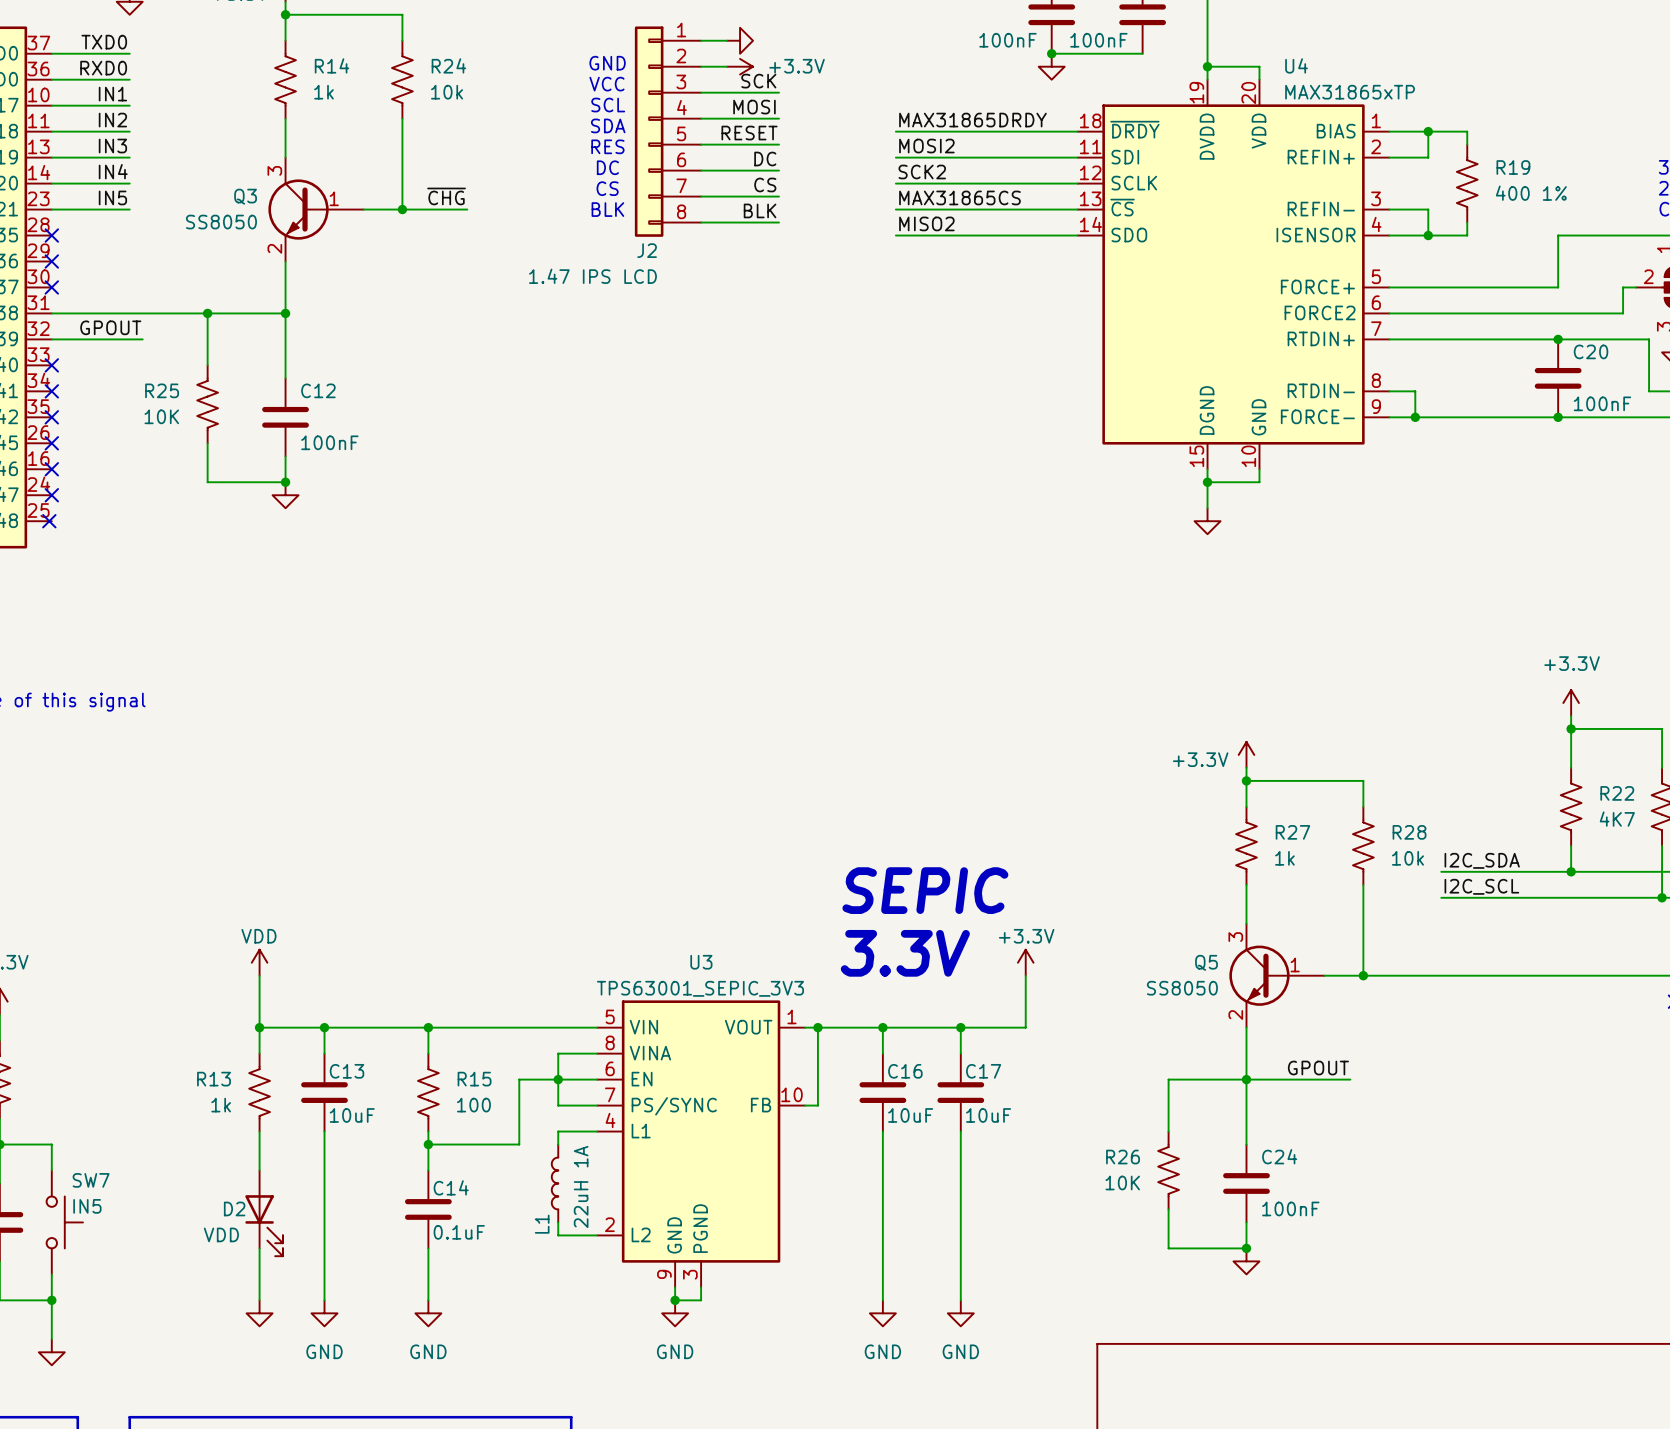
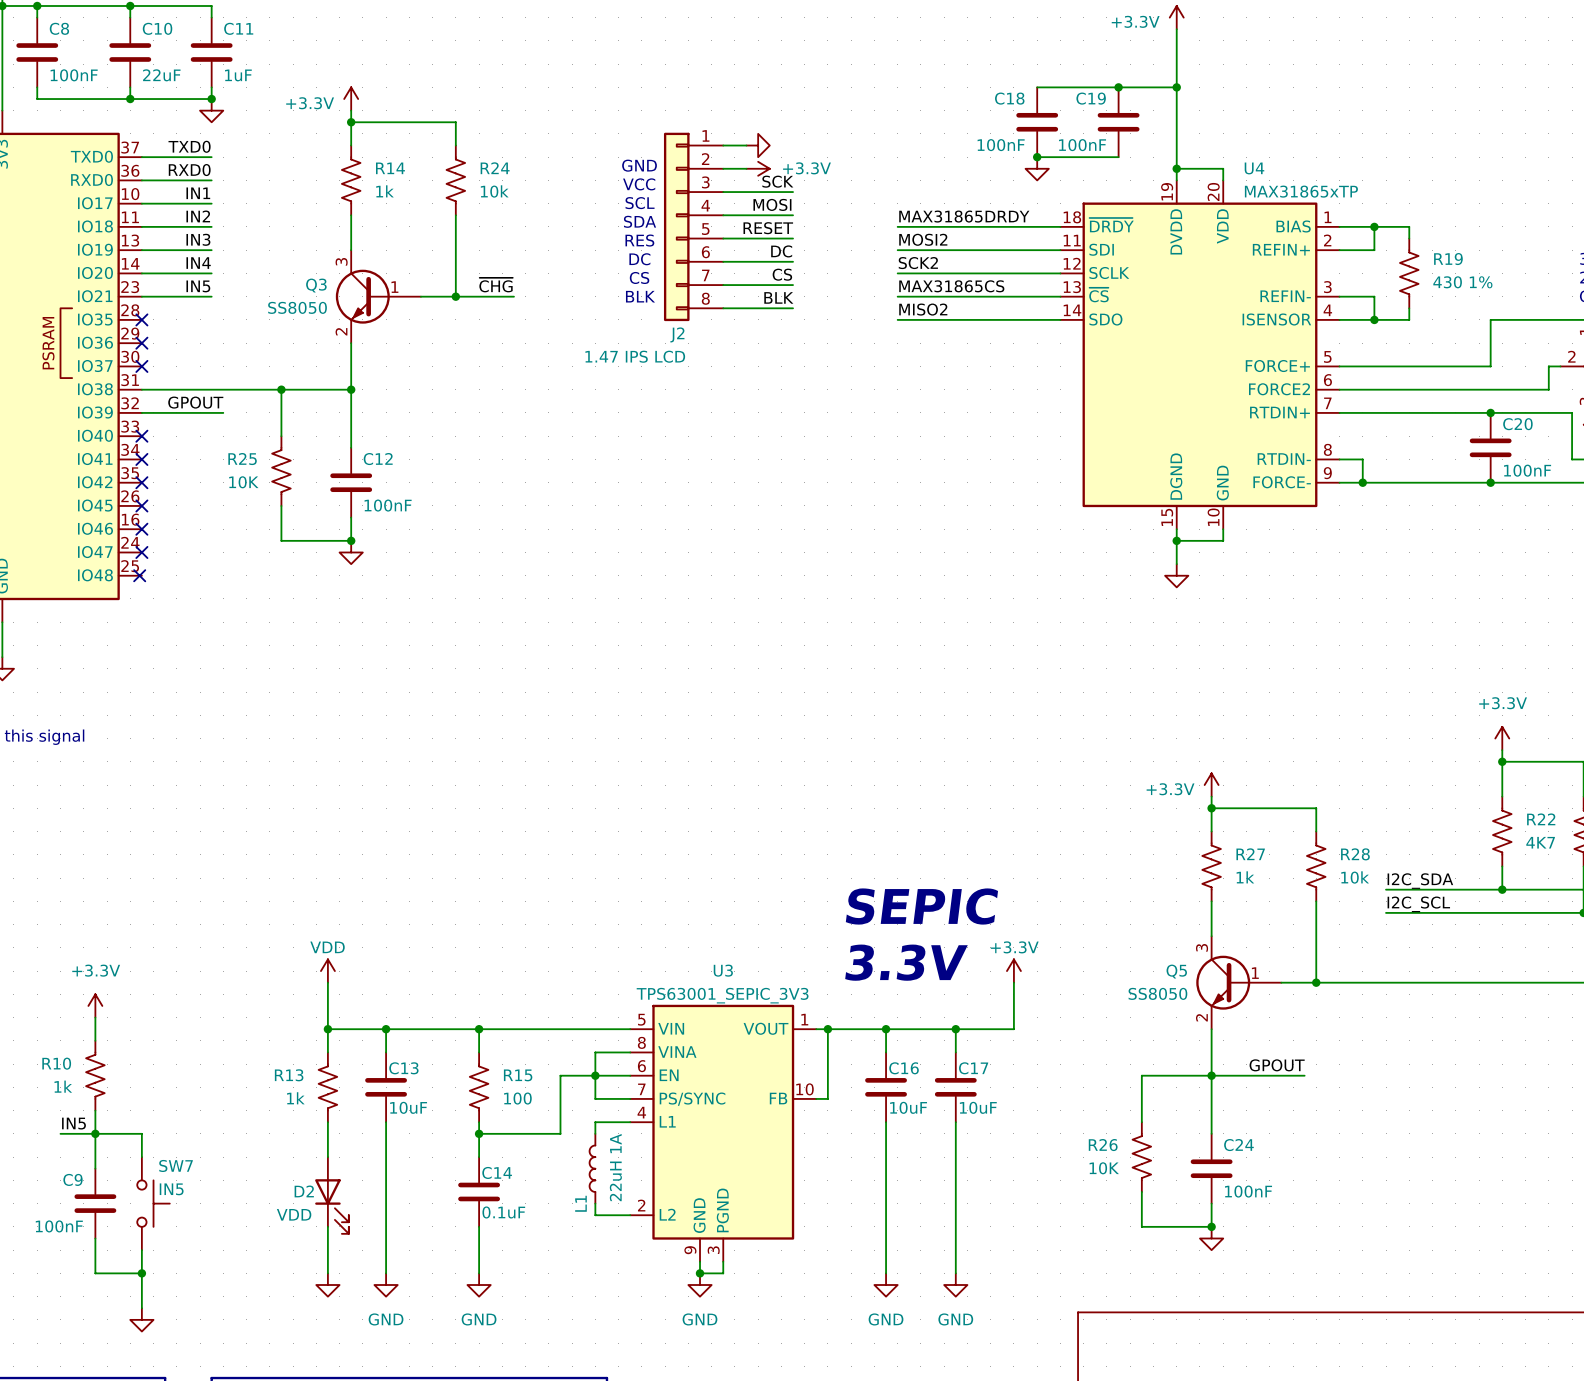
R19 value: 400 1% (1531, 193) -> 430 1% (1462, 282)

